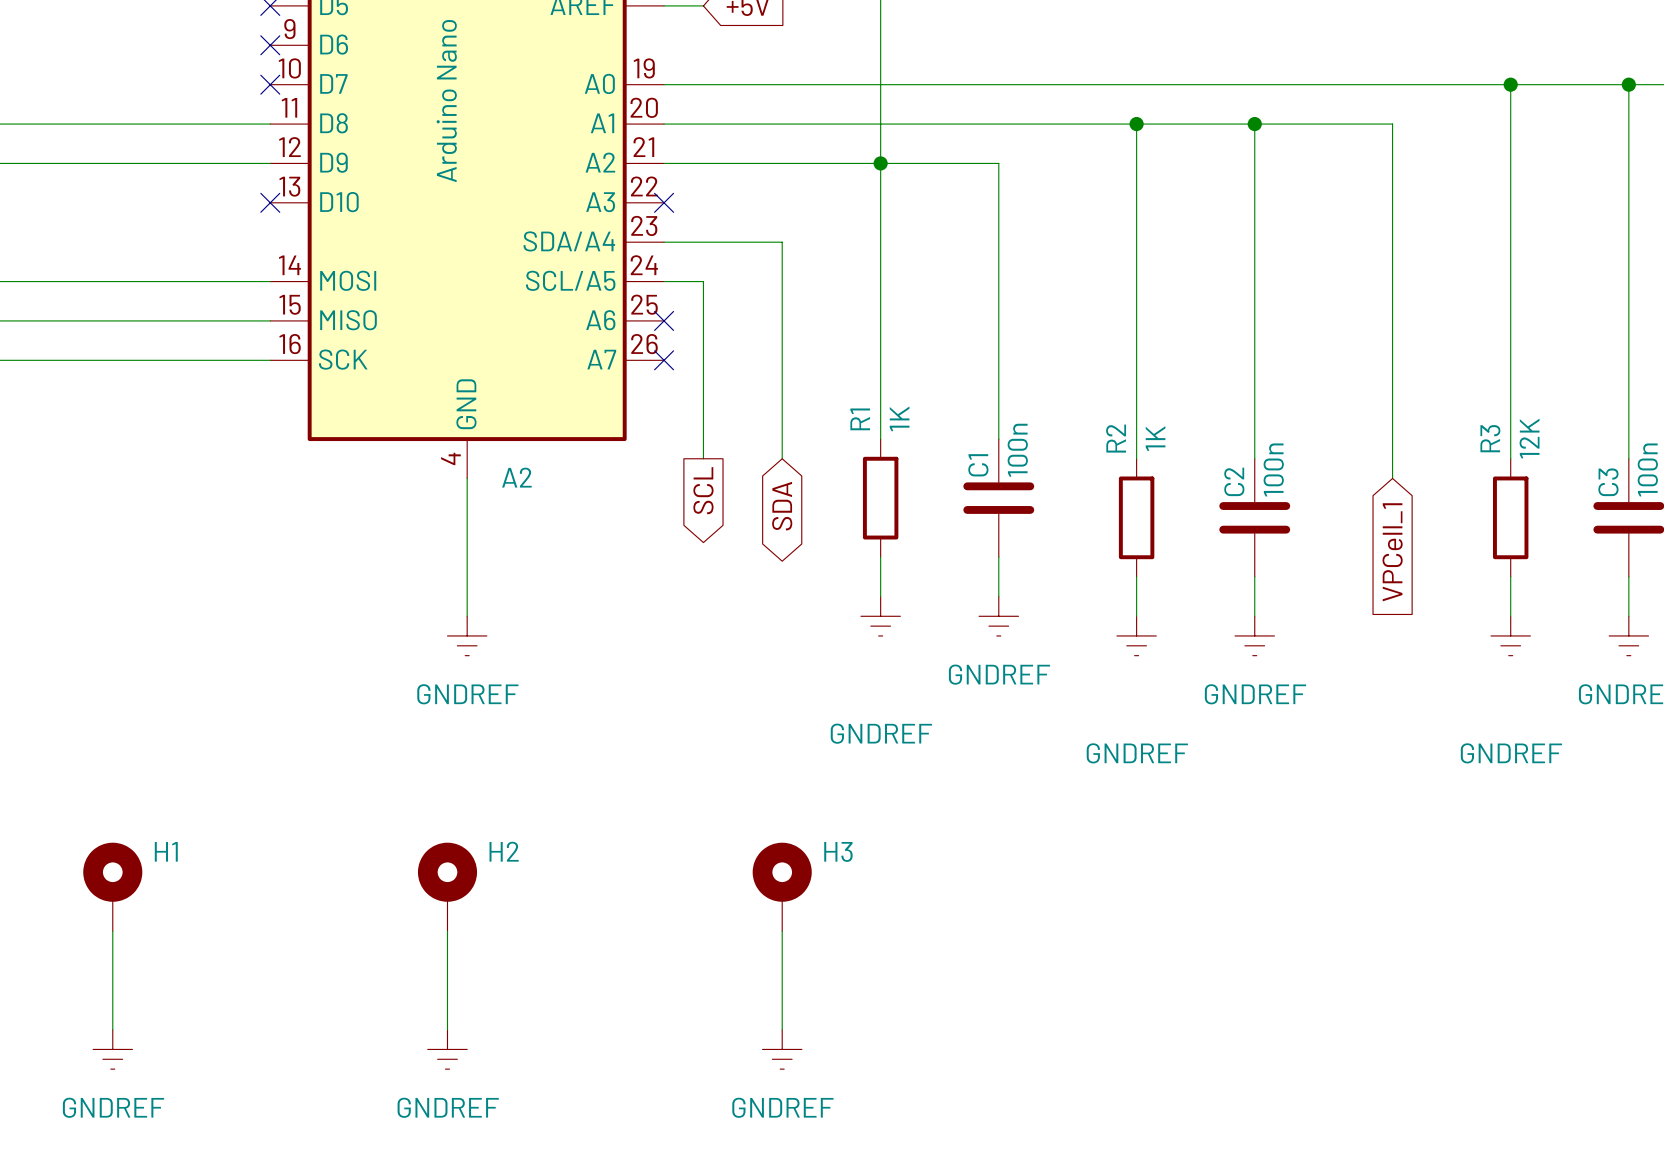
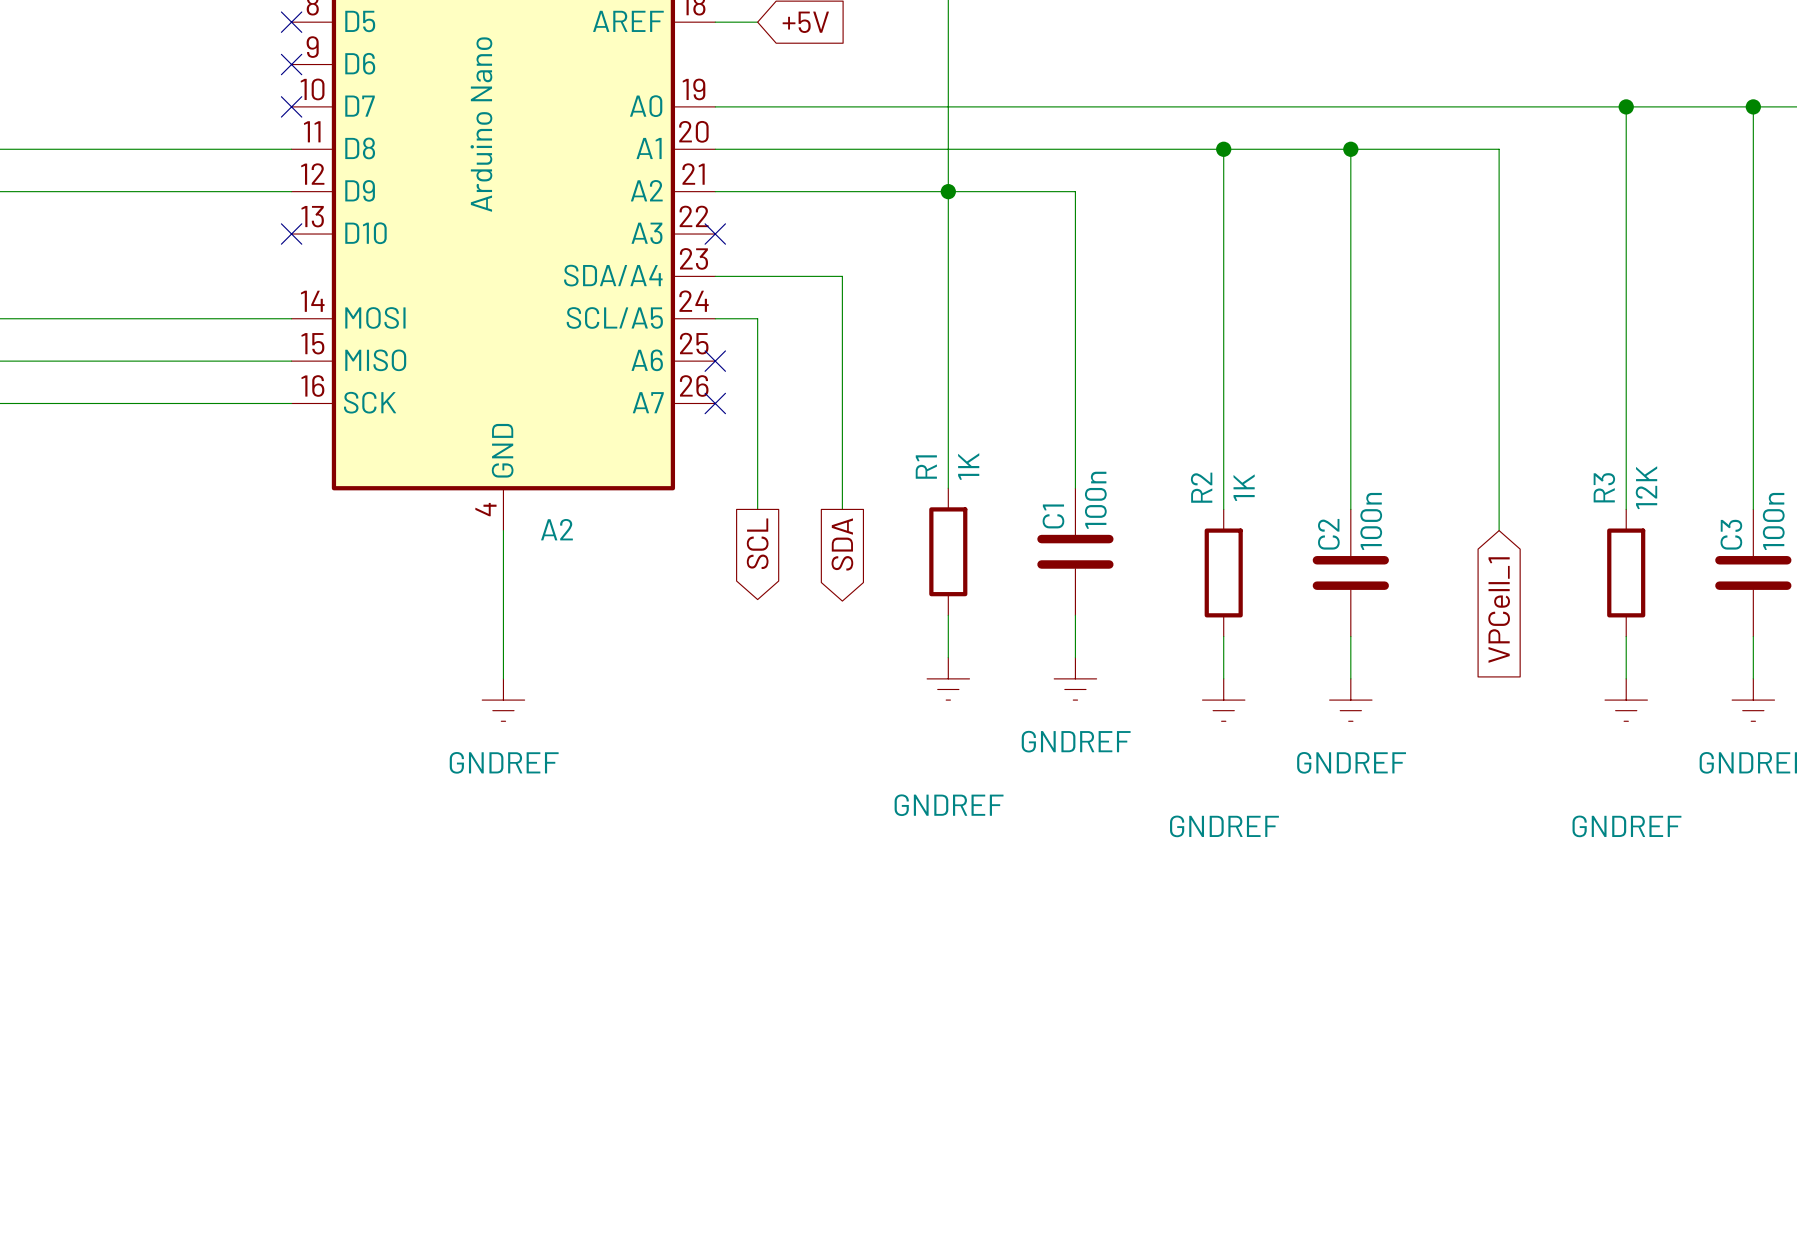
global label shape: bidirectional (782, 506) -> output (842, 544)
H1: (112, 887) -> none
H2: (447, 887) -> none
H3: (782, 887) -> none
wire: (112, 931) (112, 1029) -> none
wire: (447, 931) (447, 1029) -> none
wire: (782, 931) (782, 1029) -> none
power symbol: GNDREF (112, 1049) -> none
power symbol: GNDREF (447, 1049) -> none
power symbol: GNDREF (782, 1049) -> none

